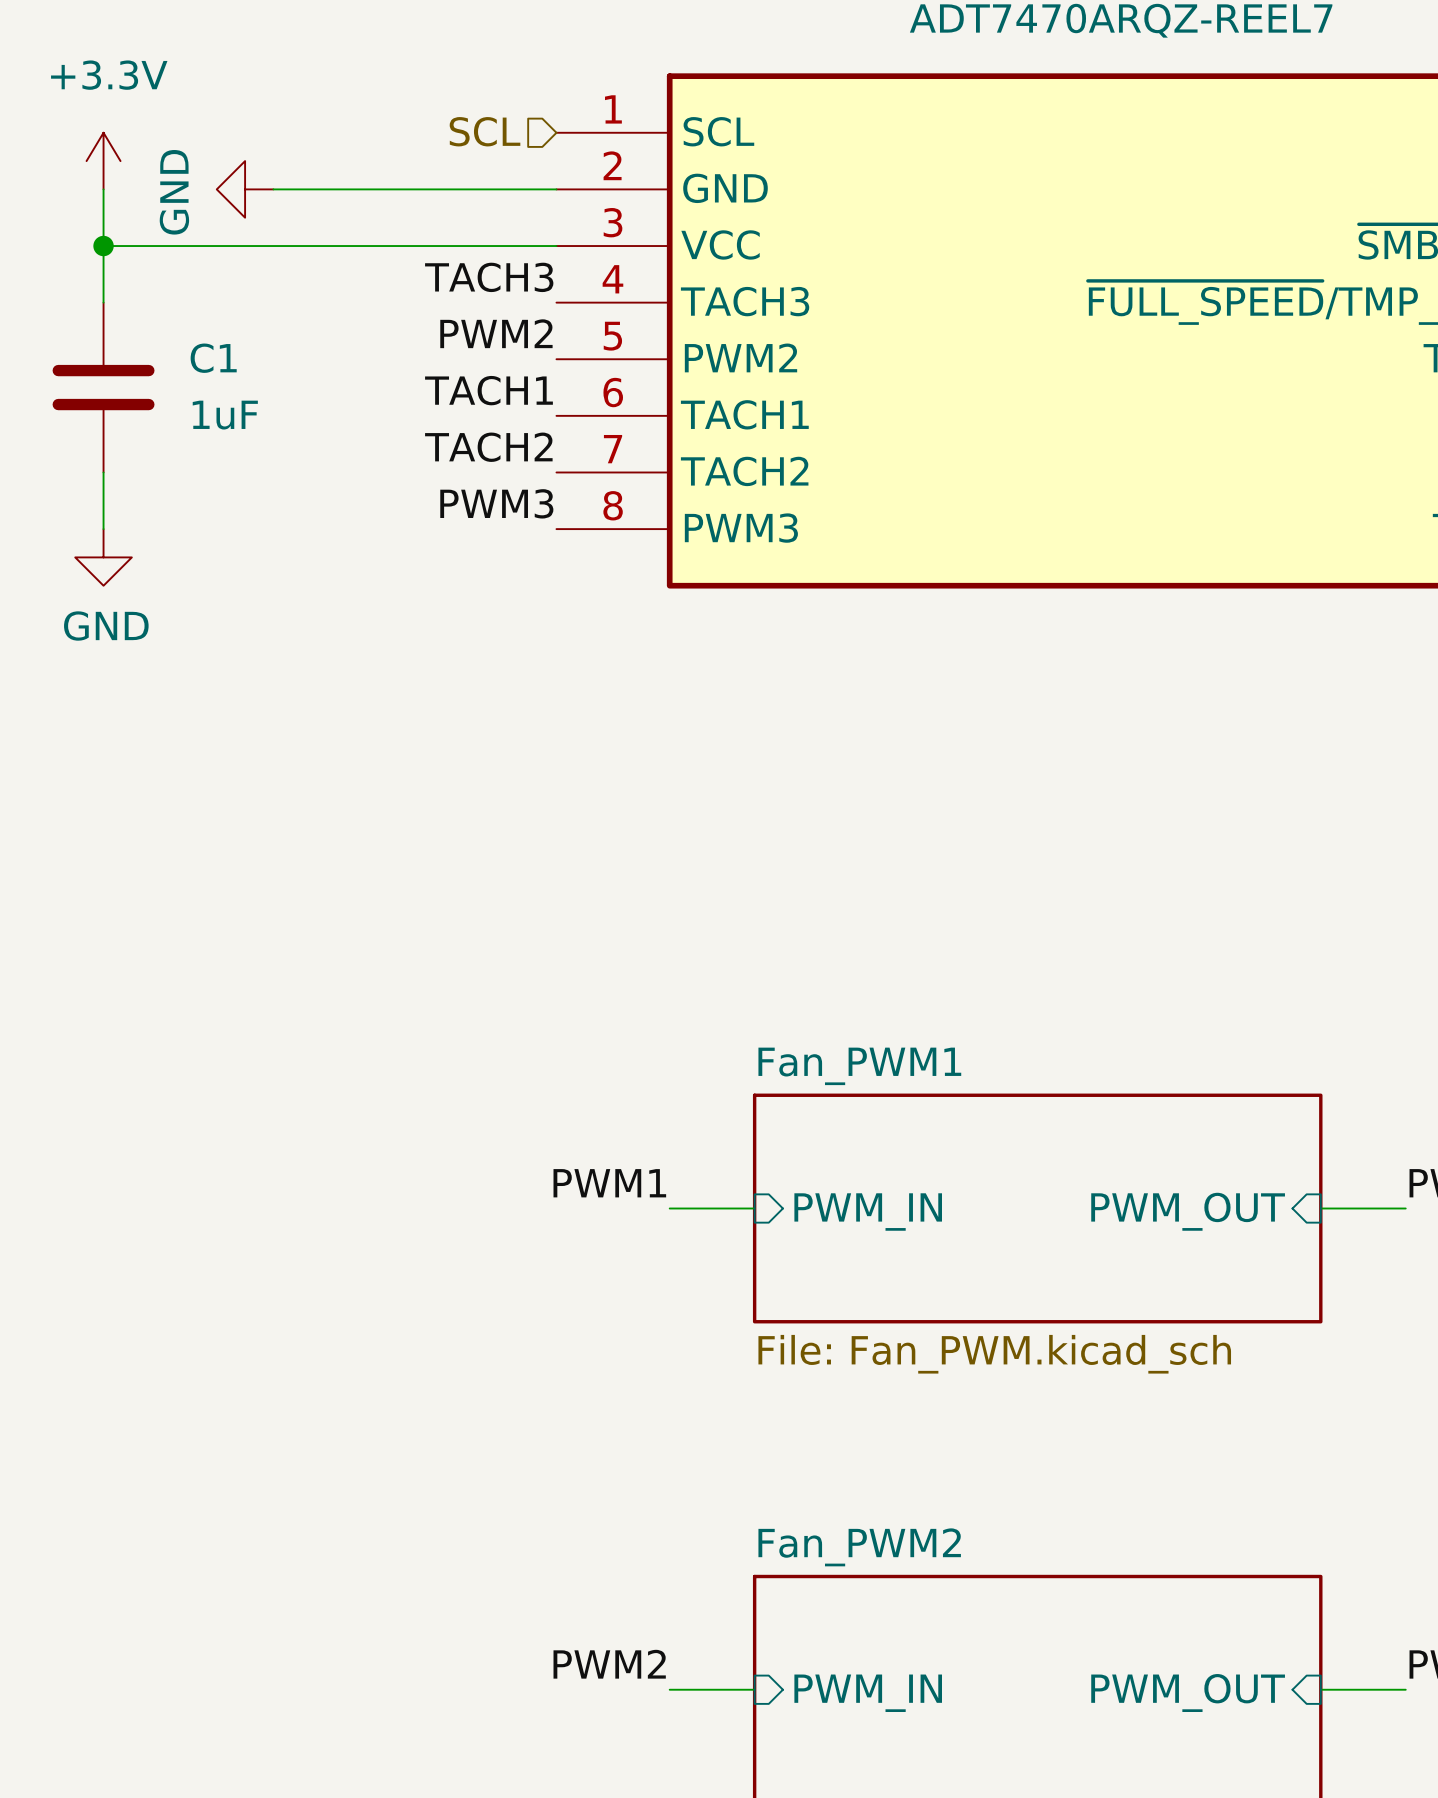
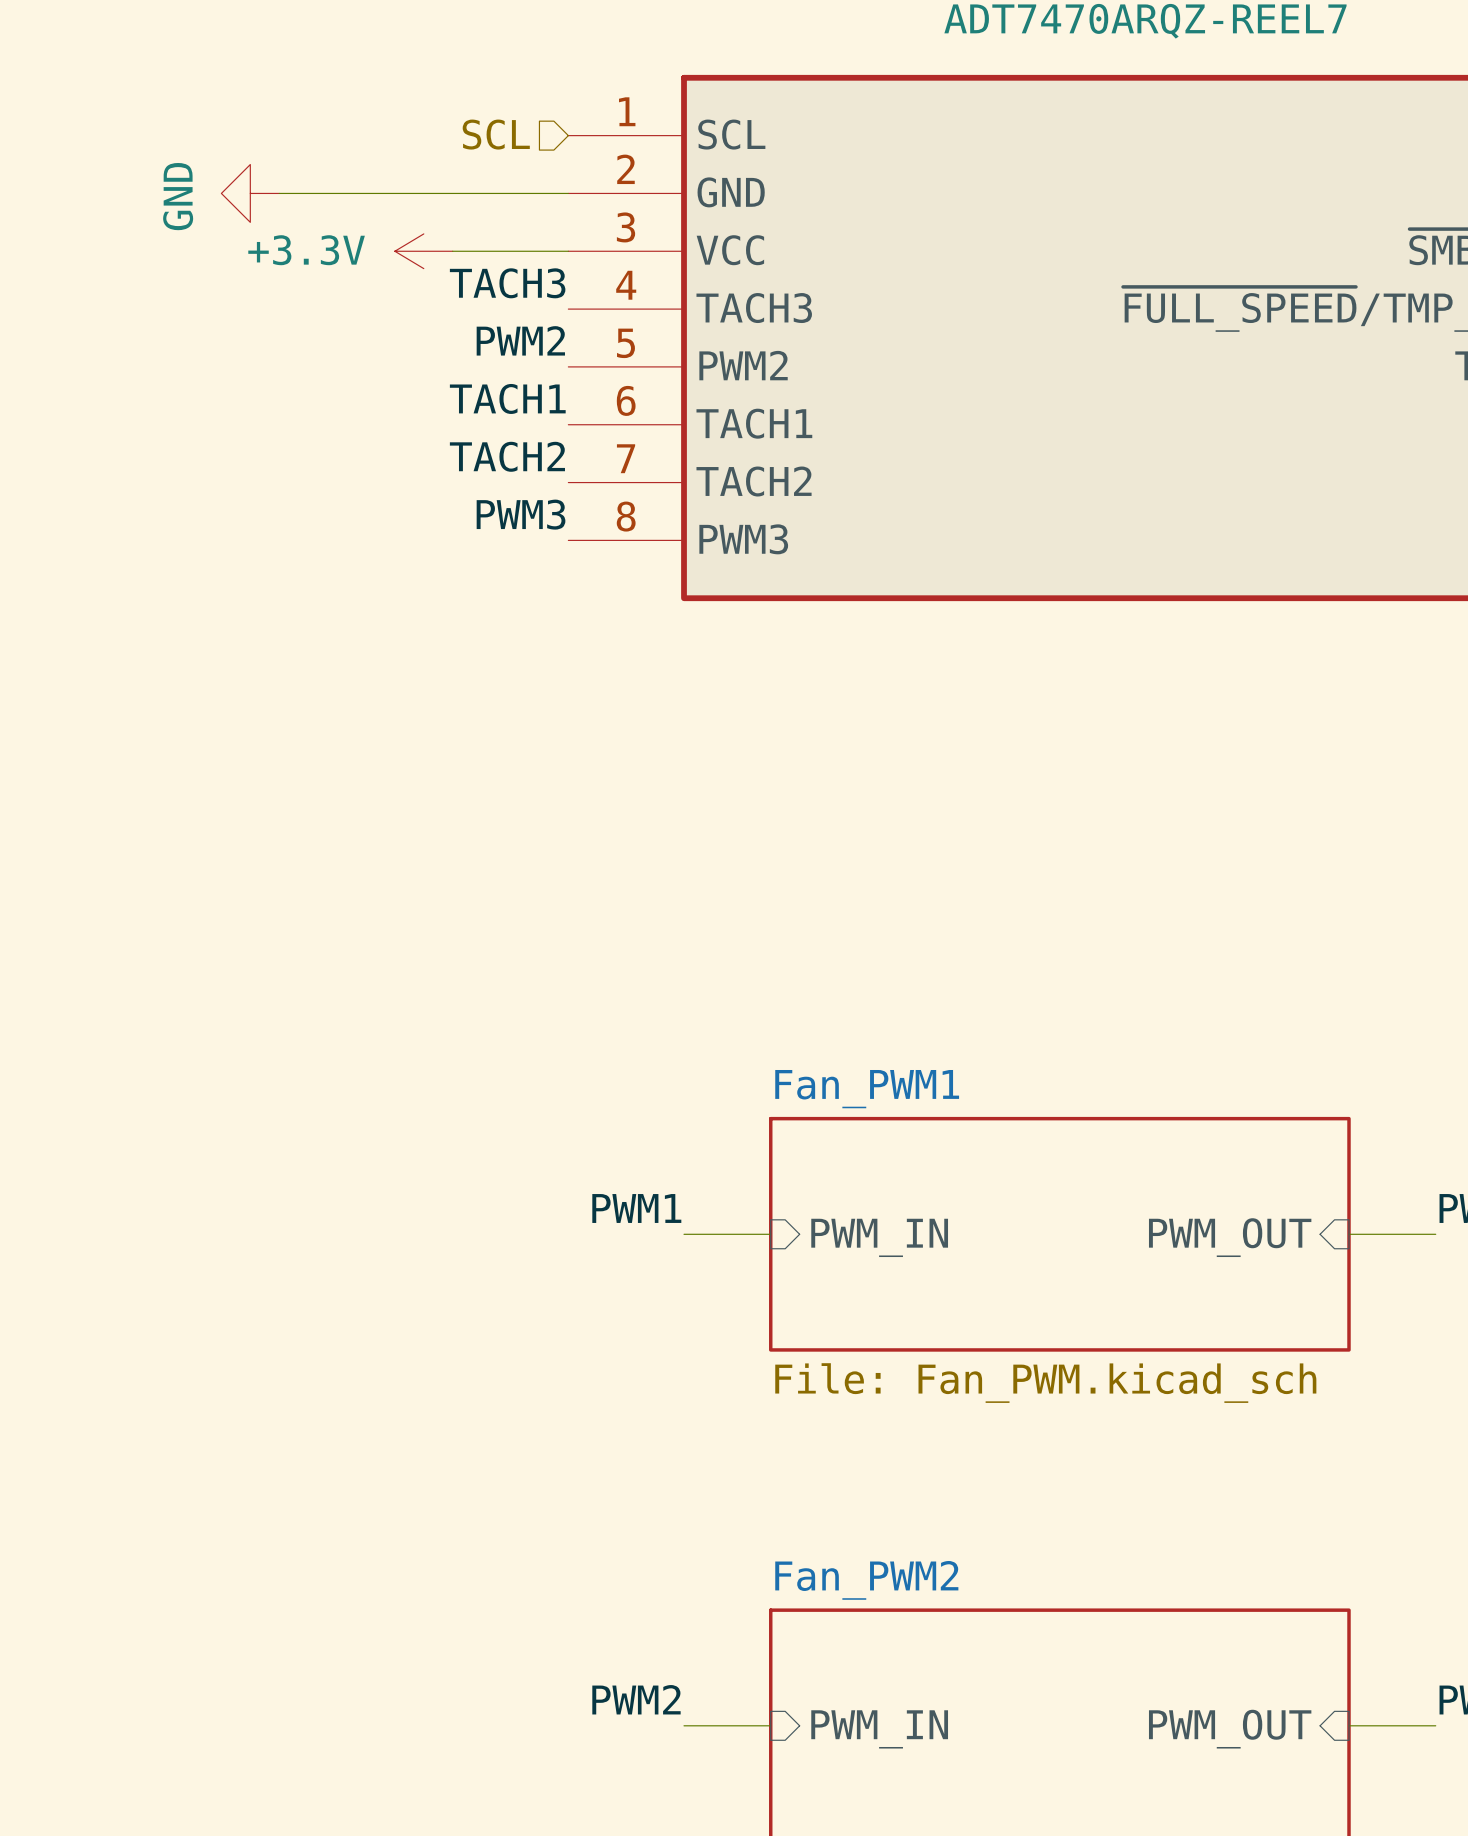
power symbol text position: +3.3V (109, 75) -> +3.3V (306, 250)
power symbol rotation: 0° (103, 161) -> 90° counterclockwise (423, 251)
power symbol position: +3.3V (103, 161) -> +3.3V (423, 251)
wire: (103, 189) (103, 302) -> none
wire: (103, 246) (443, 246) -> none
junction: (103, 246) -> none
C1: 1uF (103, 387) -> none
wire: (103, 472) (103, 529) -> none
power symbol: GND (103, 557) -> none

